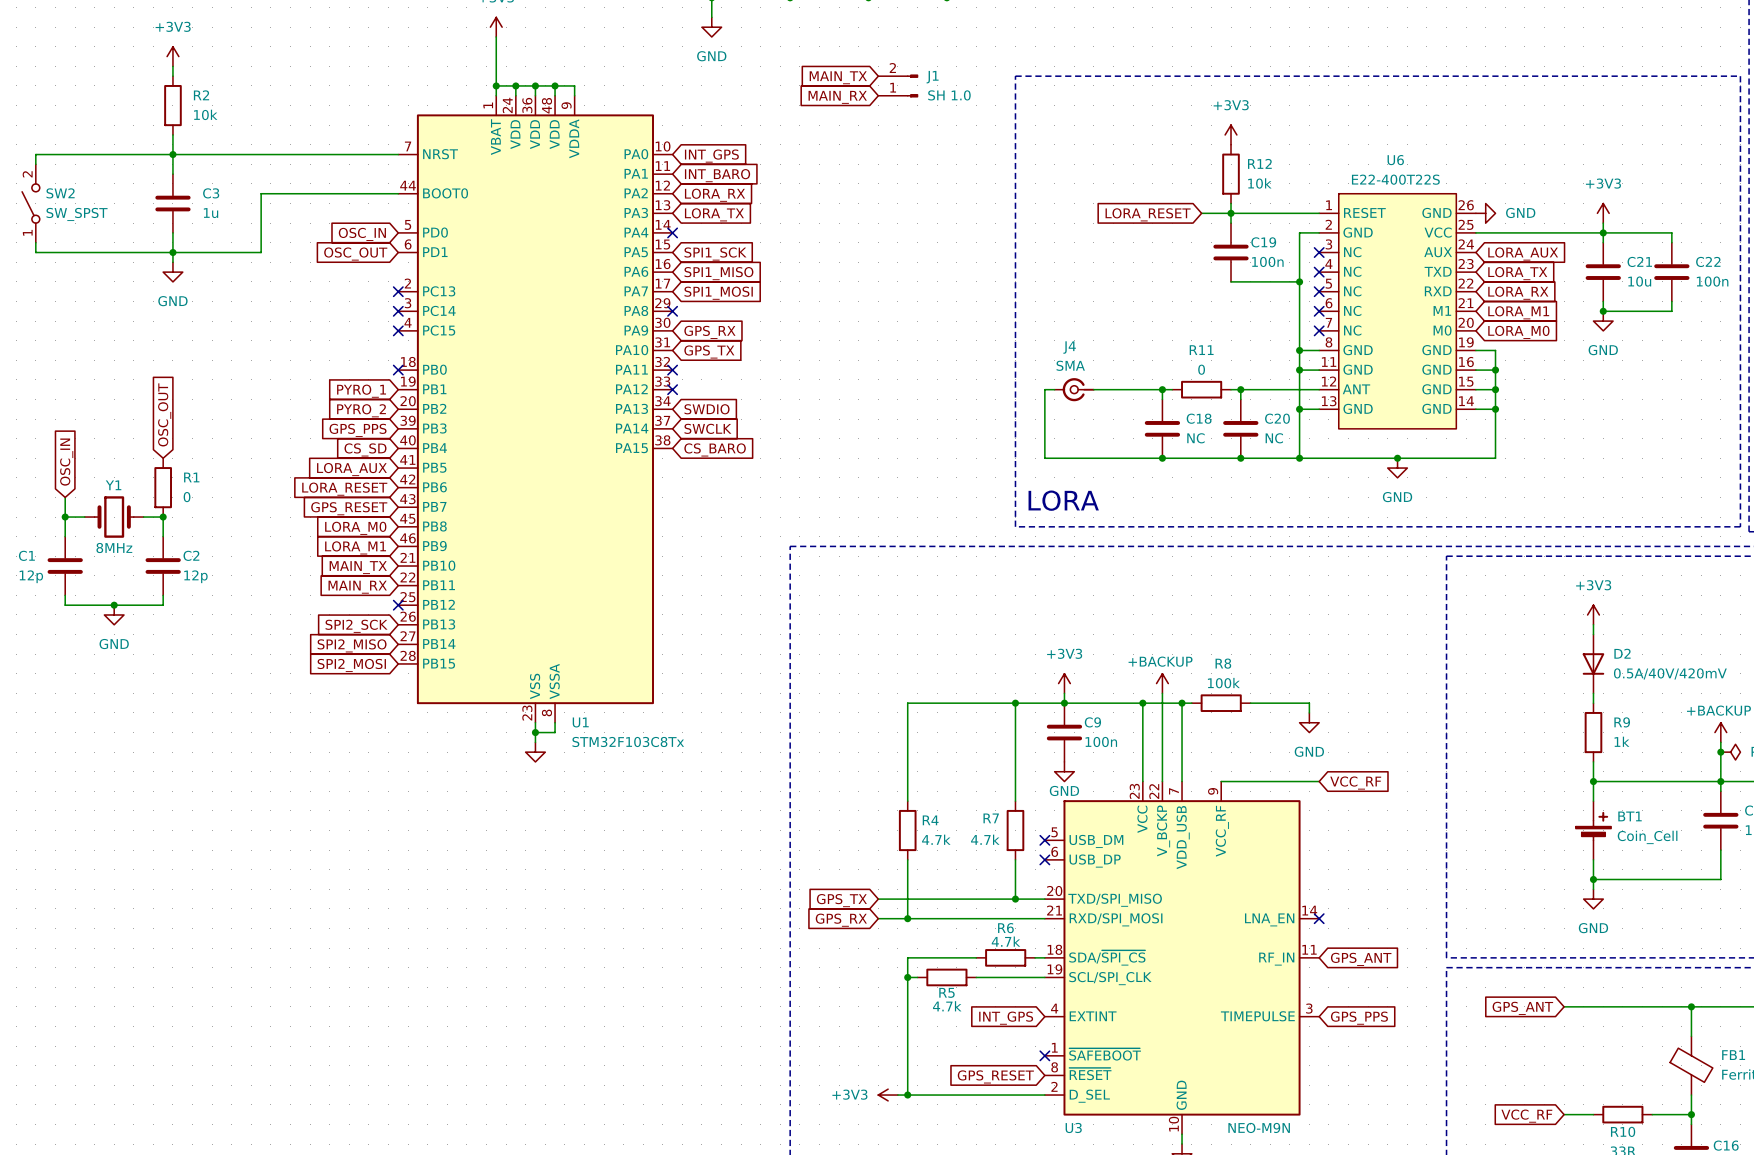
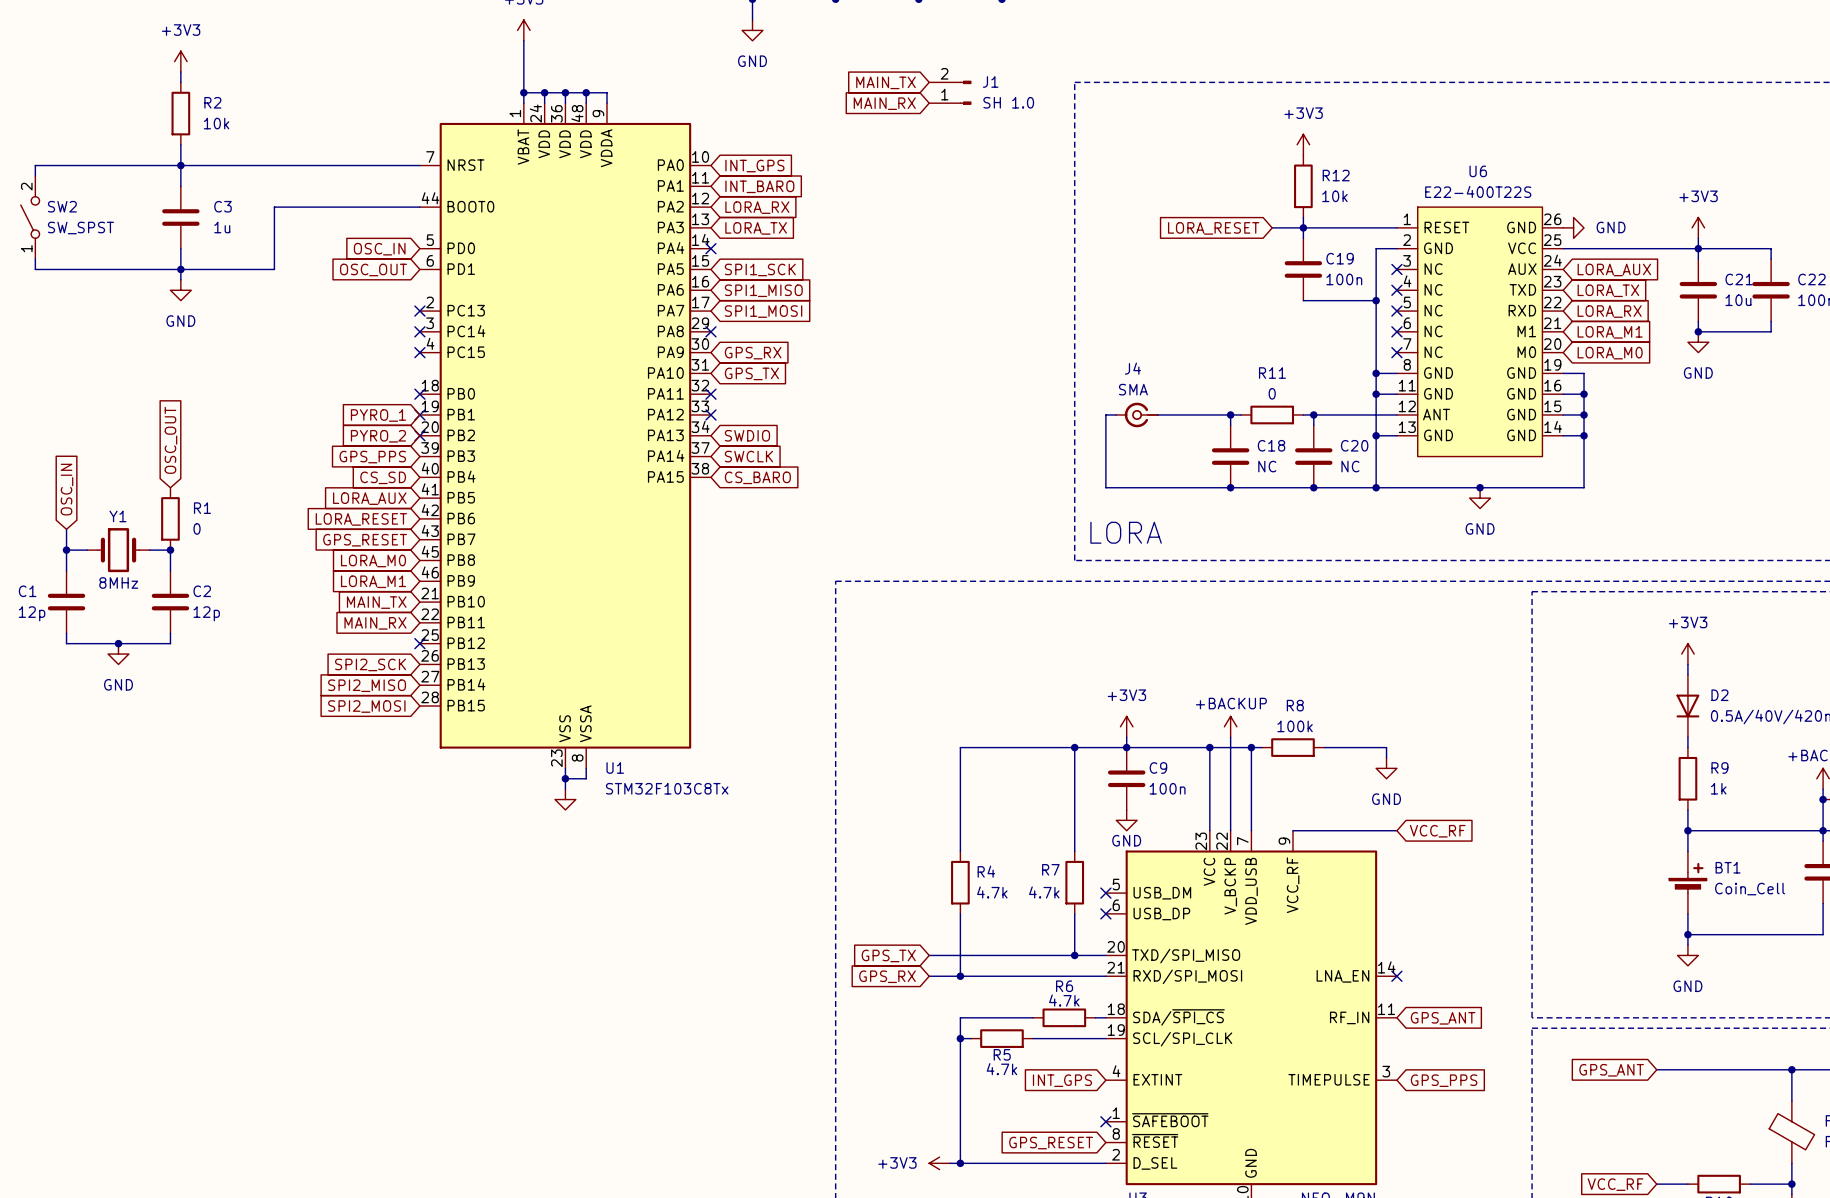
no-connect mark: none -> (419, 414)
no-connect mark: none -> (419, 435)

